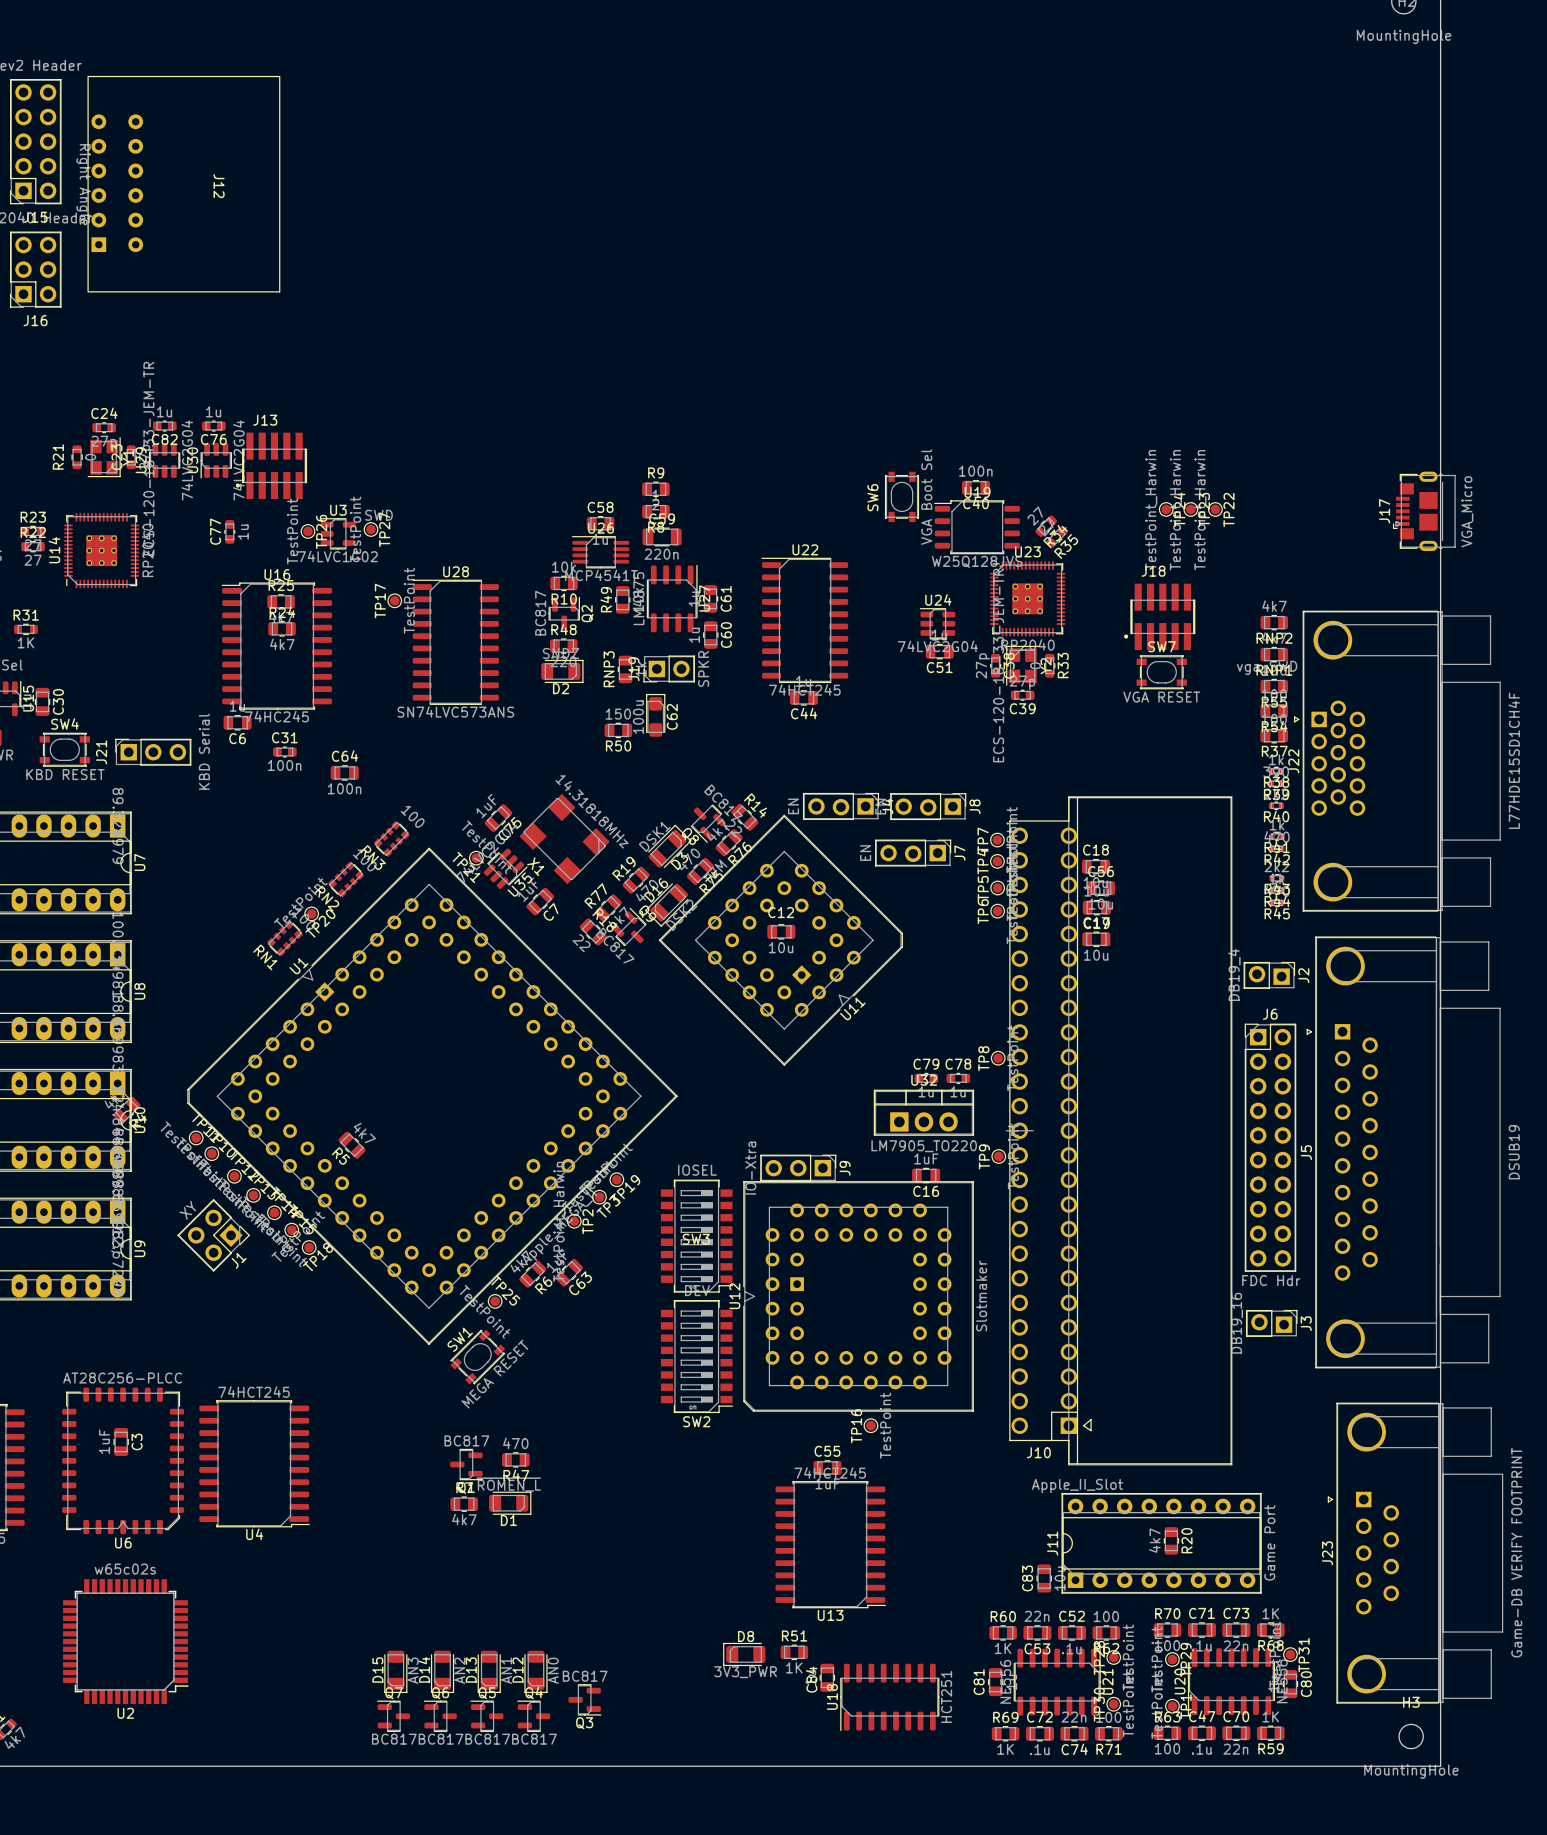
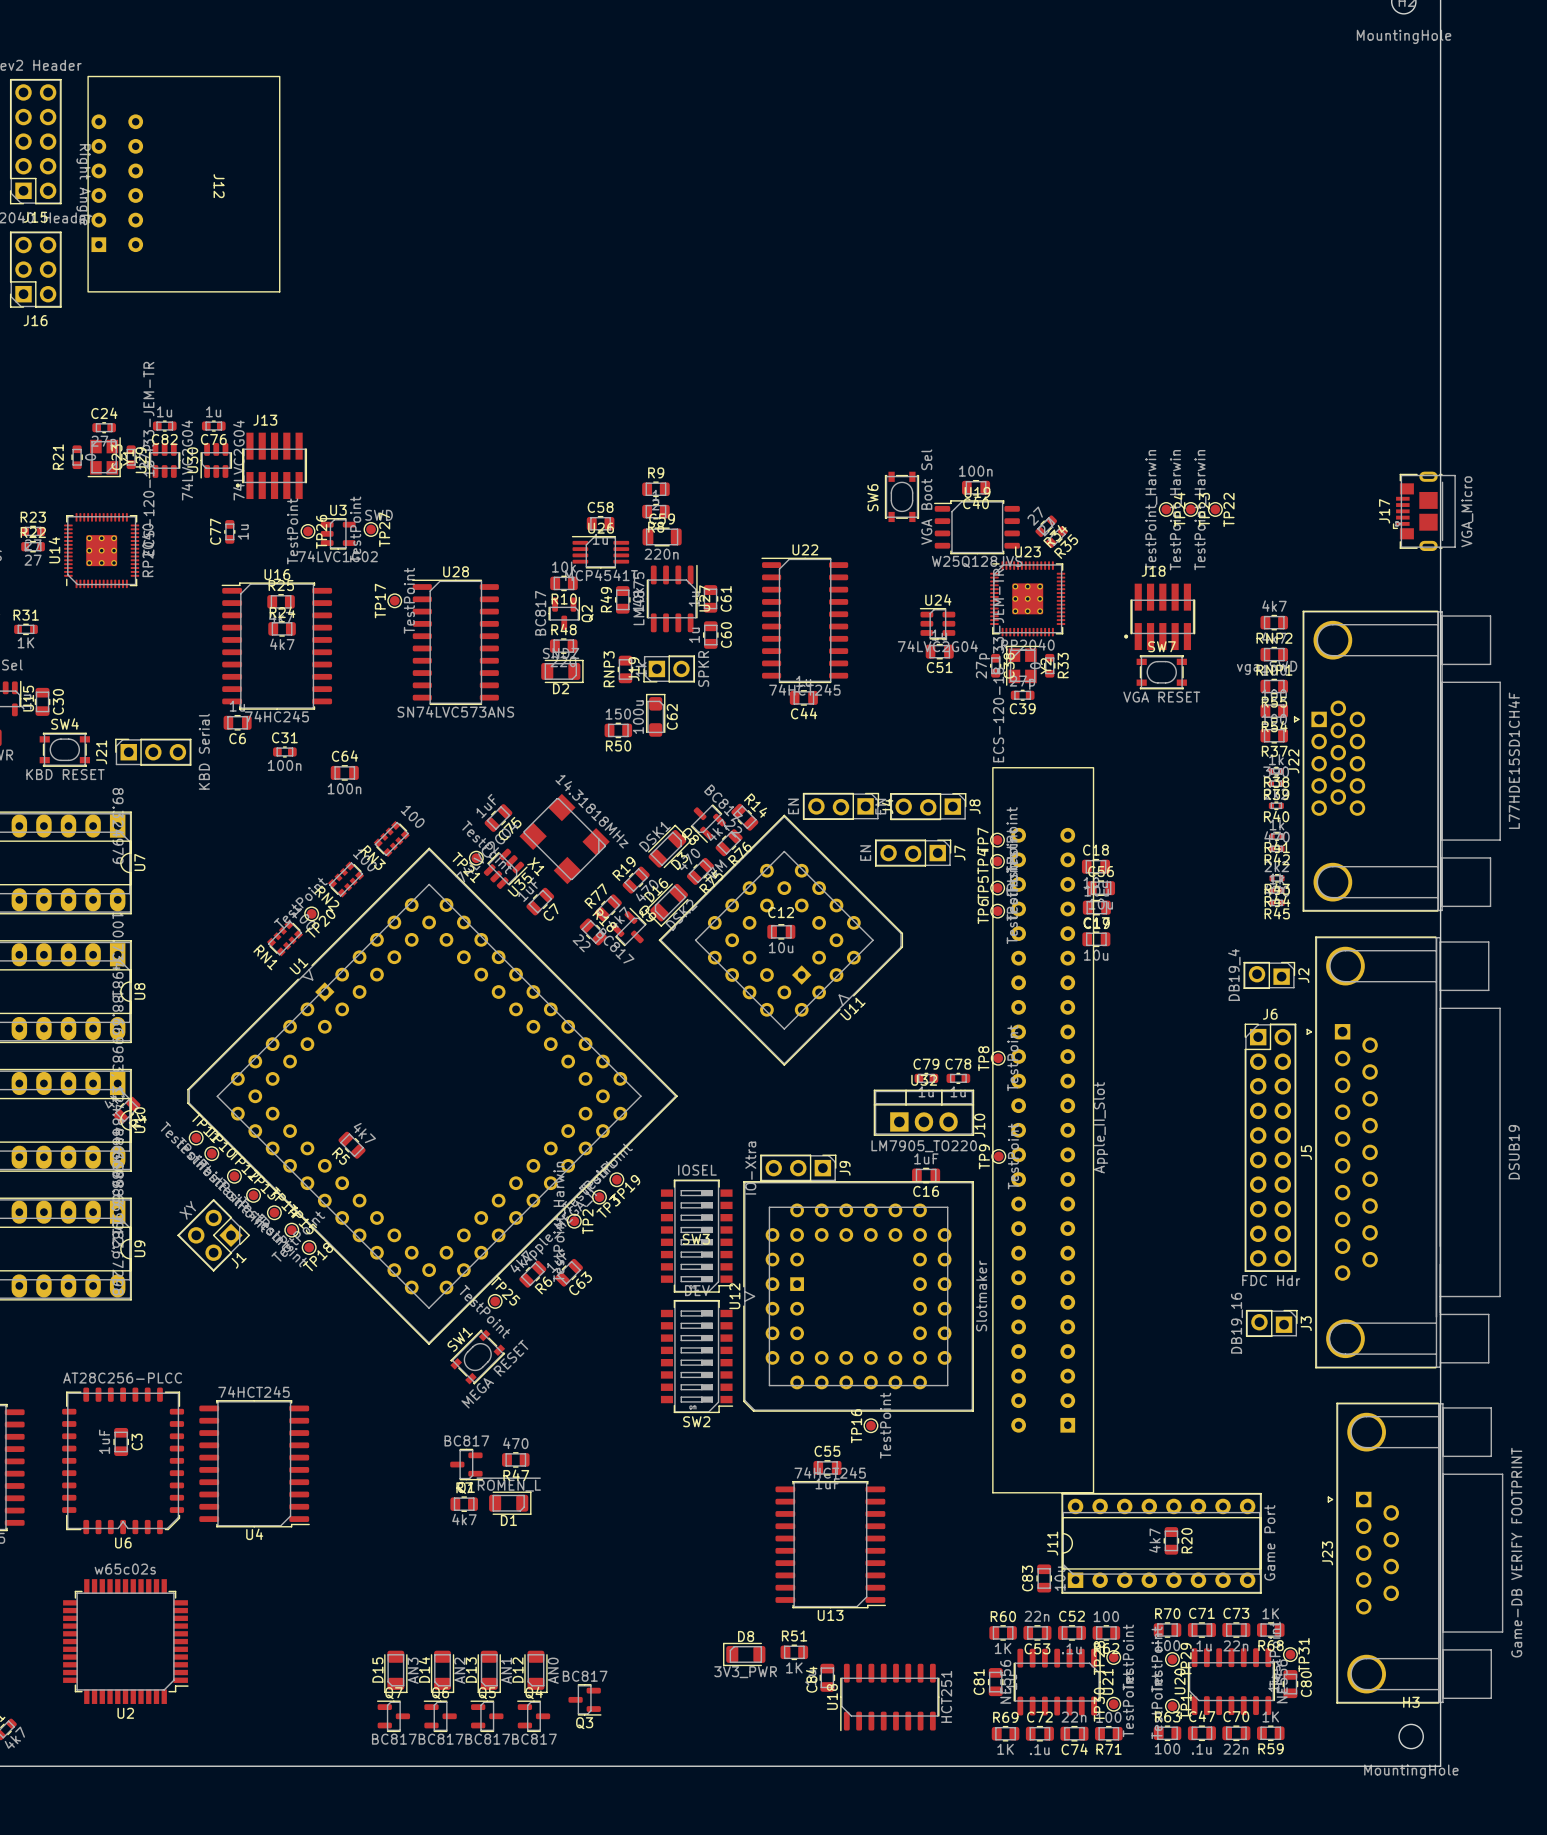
J10 footprint: [1005, 796, 1233, 1466] -> [992, 767, 1095, 1494]
J10 name position: J10 (1038, 1452) -> J10 (979, 1125)
J10 value position: Apple_II_Slot (1077, 1486) -> Apple_II_Slot (1100, 1127)

